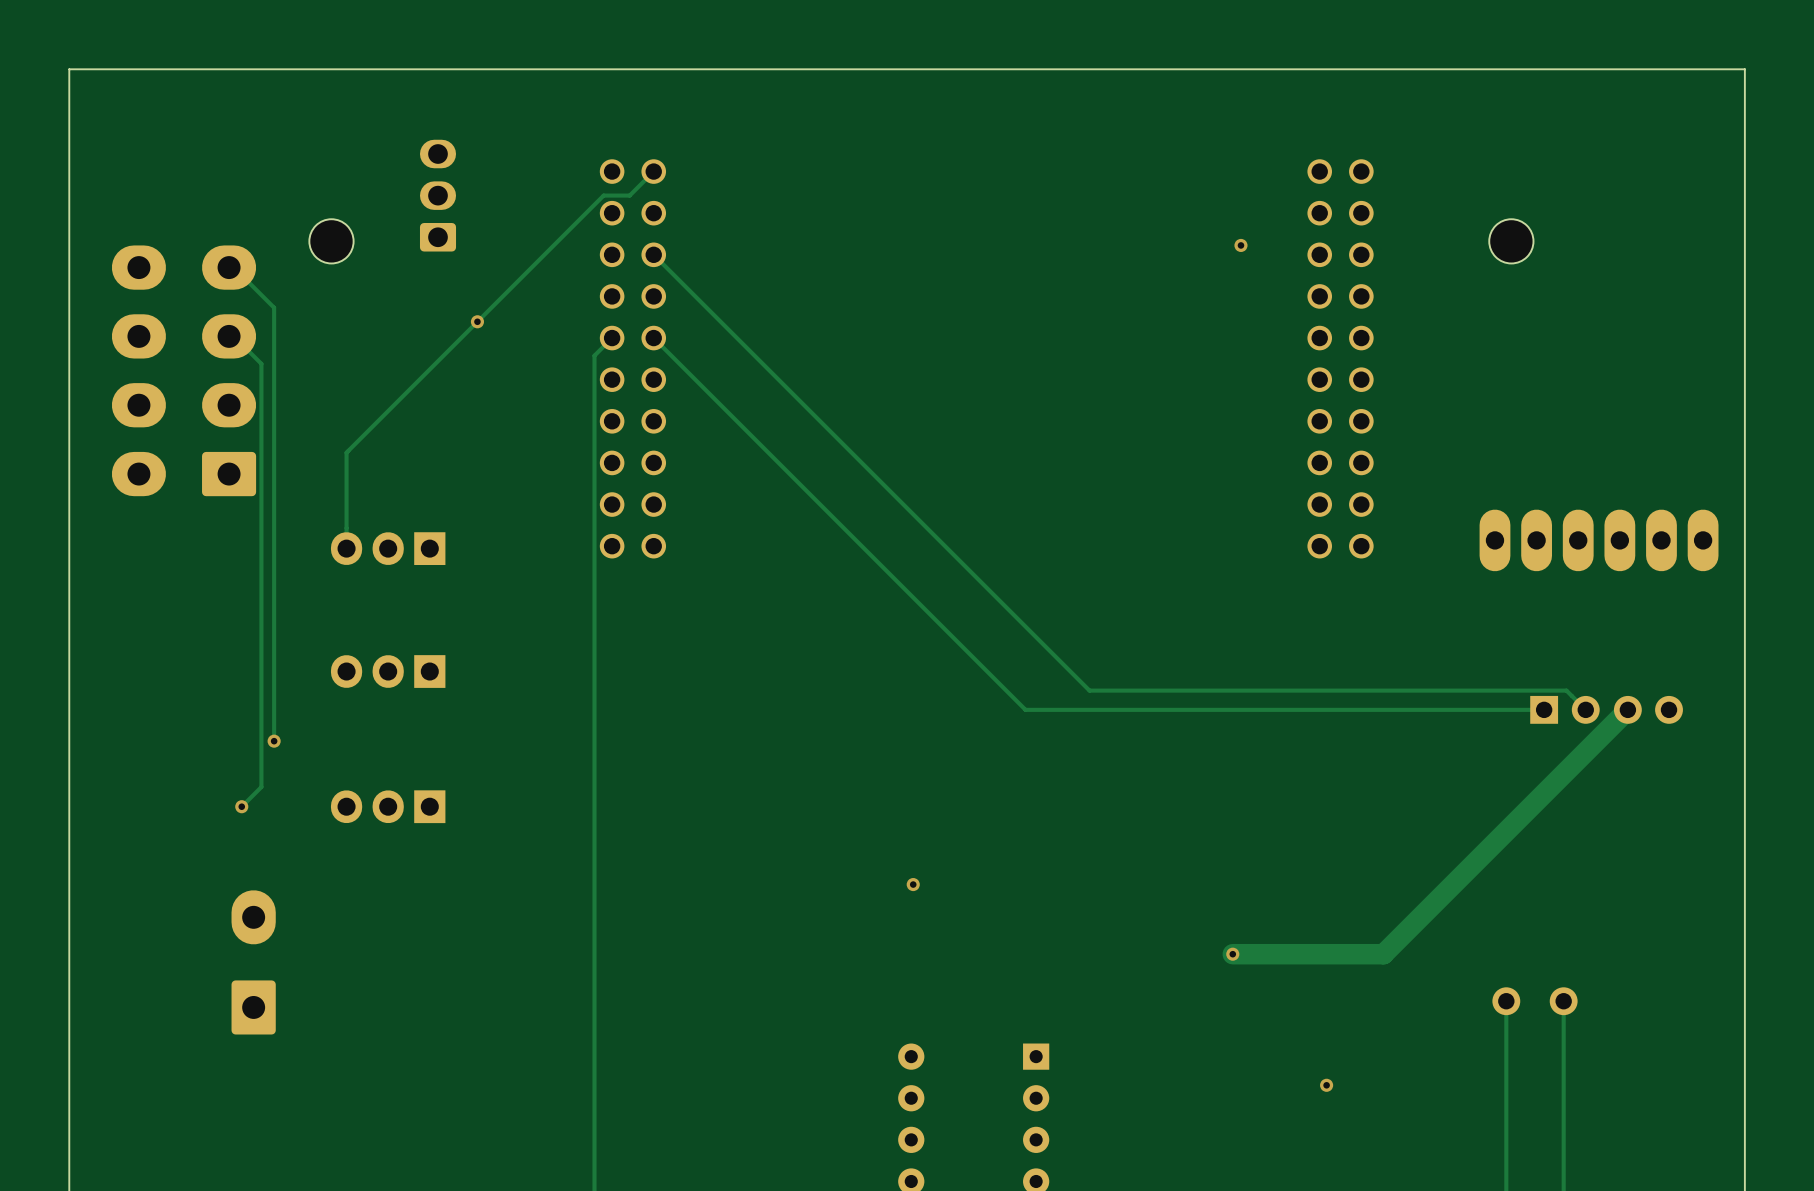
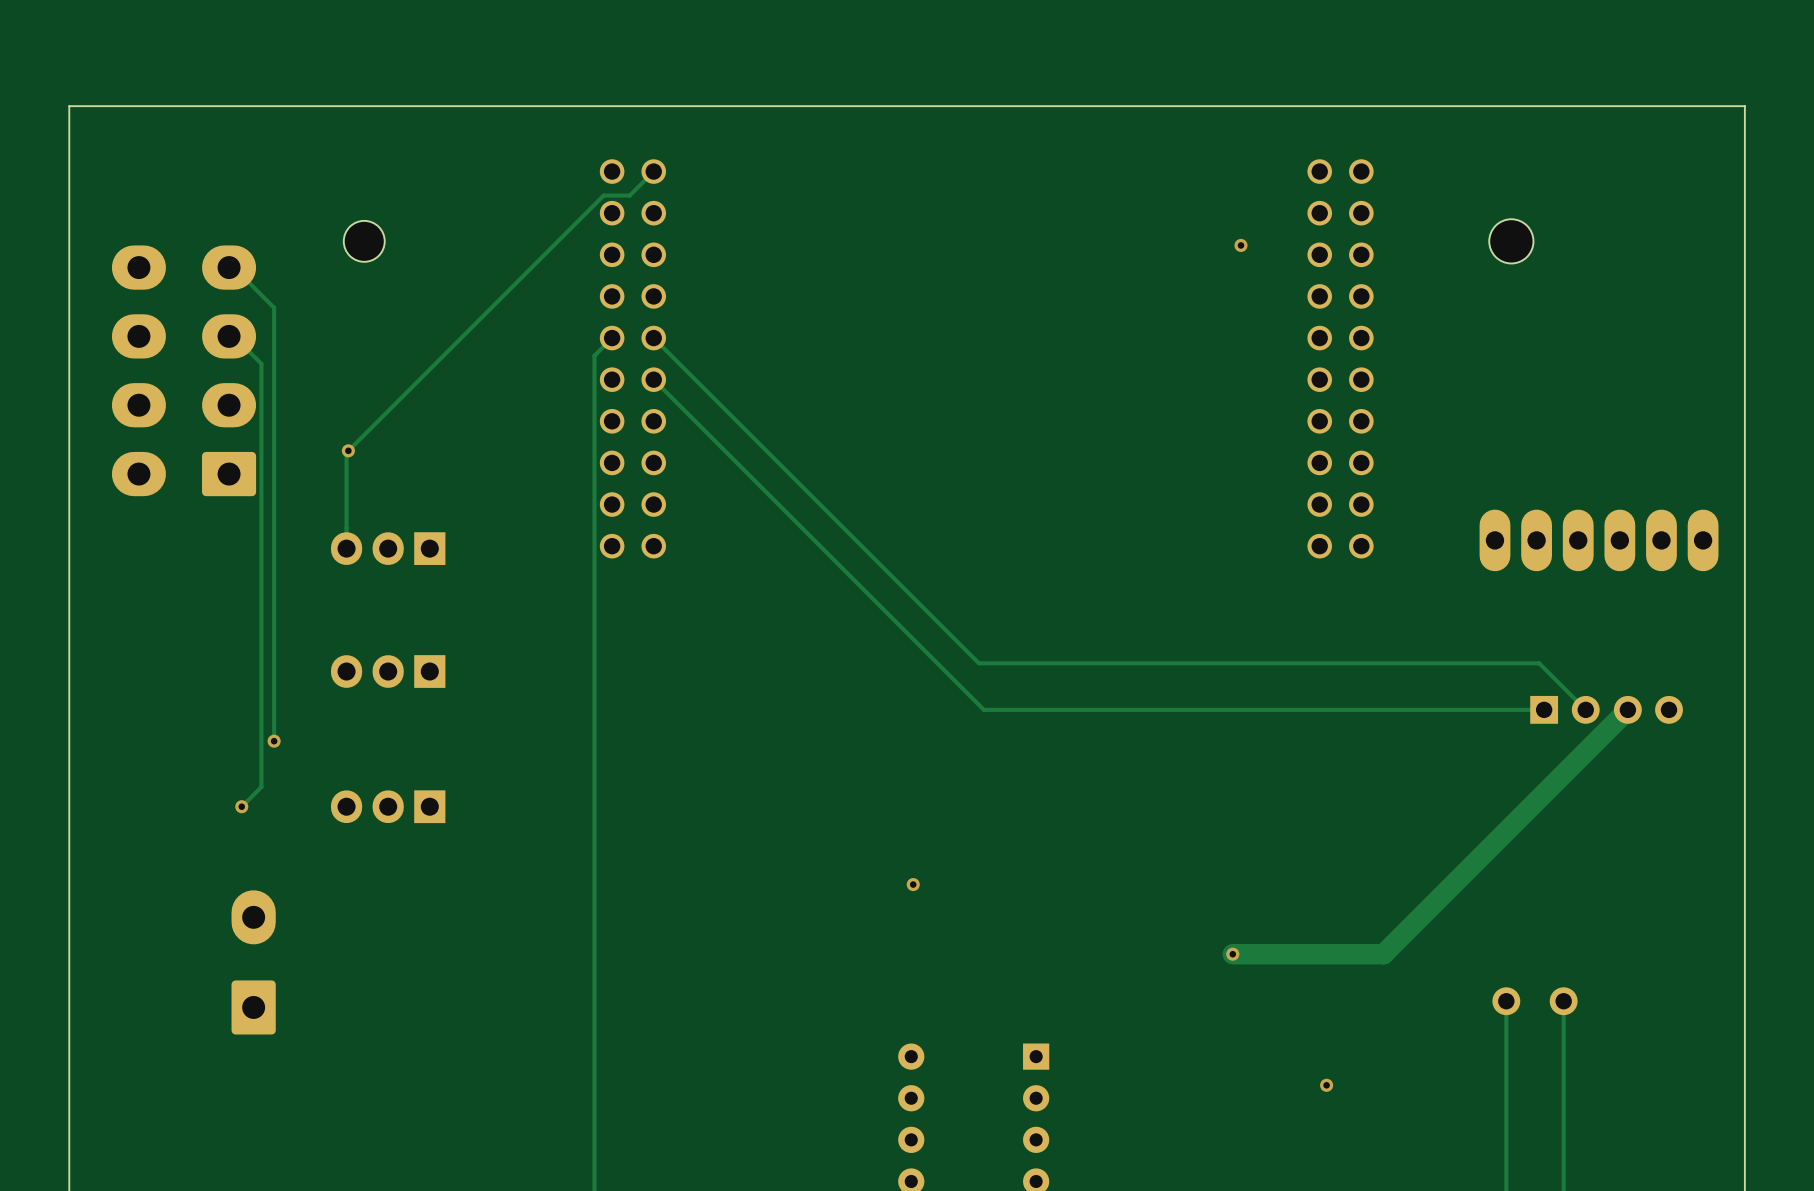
board edge: (1744, 106) (1744, 69) (69, 69) (69, 106) -> (1744, 106) (69, 106)
part: (438, 195) -> none
part: (331, 241) -> none
part: none -> (364, 241)
track: (653, 254) (1089, 690) (1566, 690) -> (979, 663) (1539, 663) (1566, 690)
via: (477, 321) -> none
via: none -> (348, 450)
track: (979, 663) (1025, 709) -> (653, 379) (983, 709) (1025, 709)

